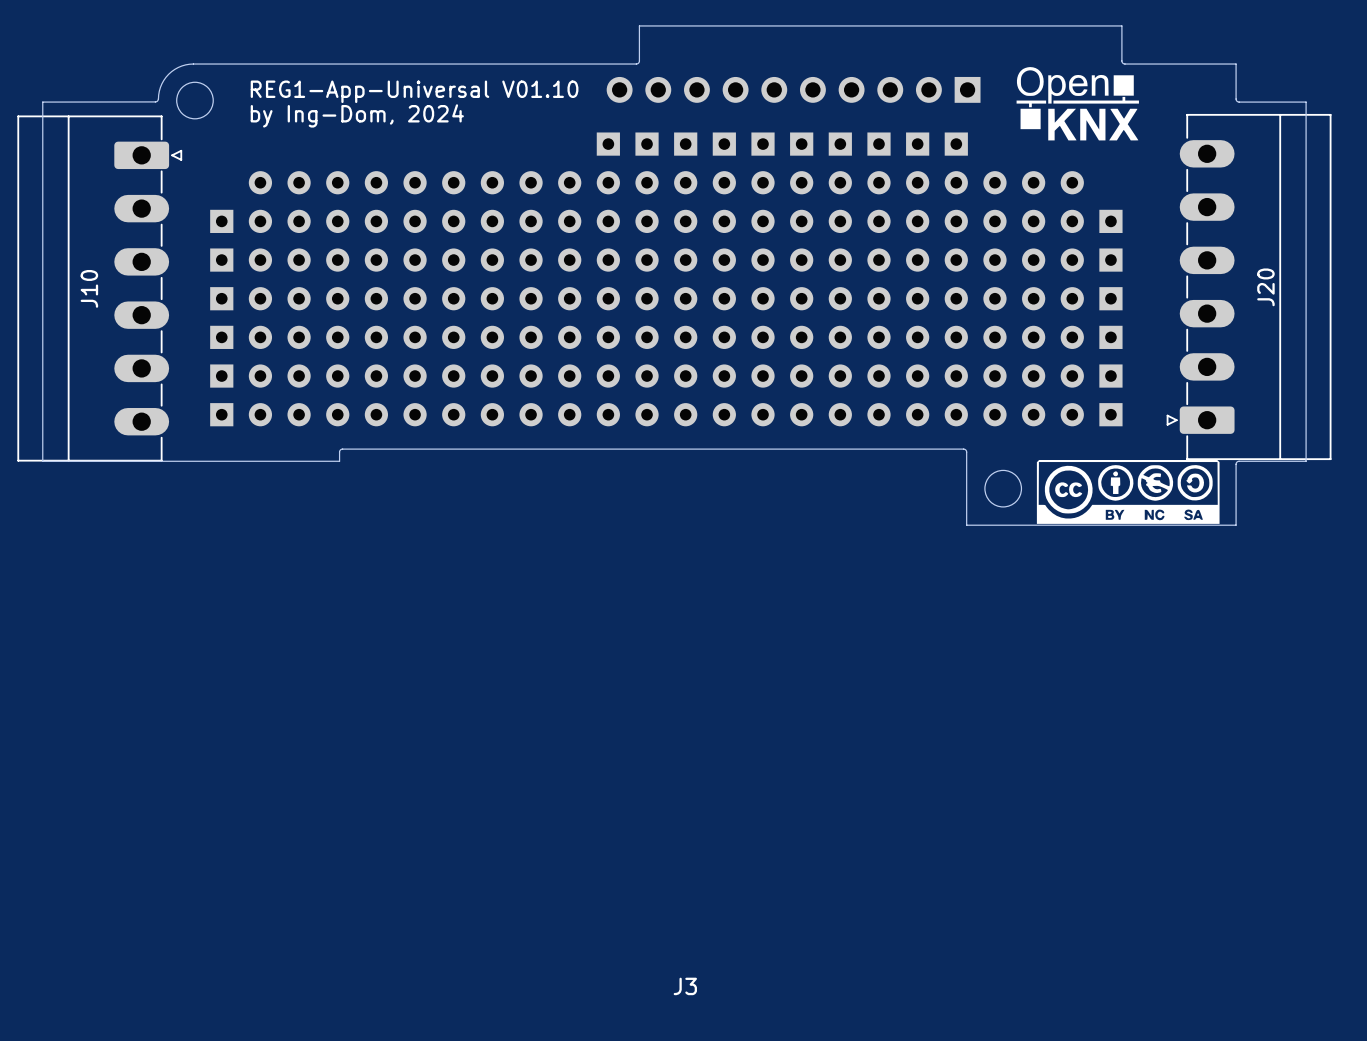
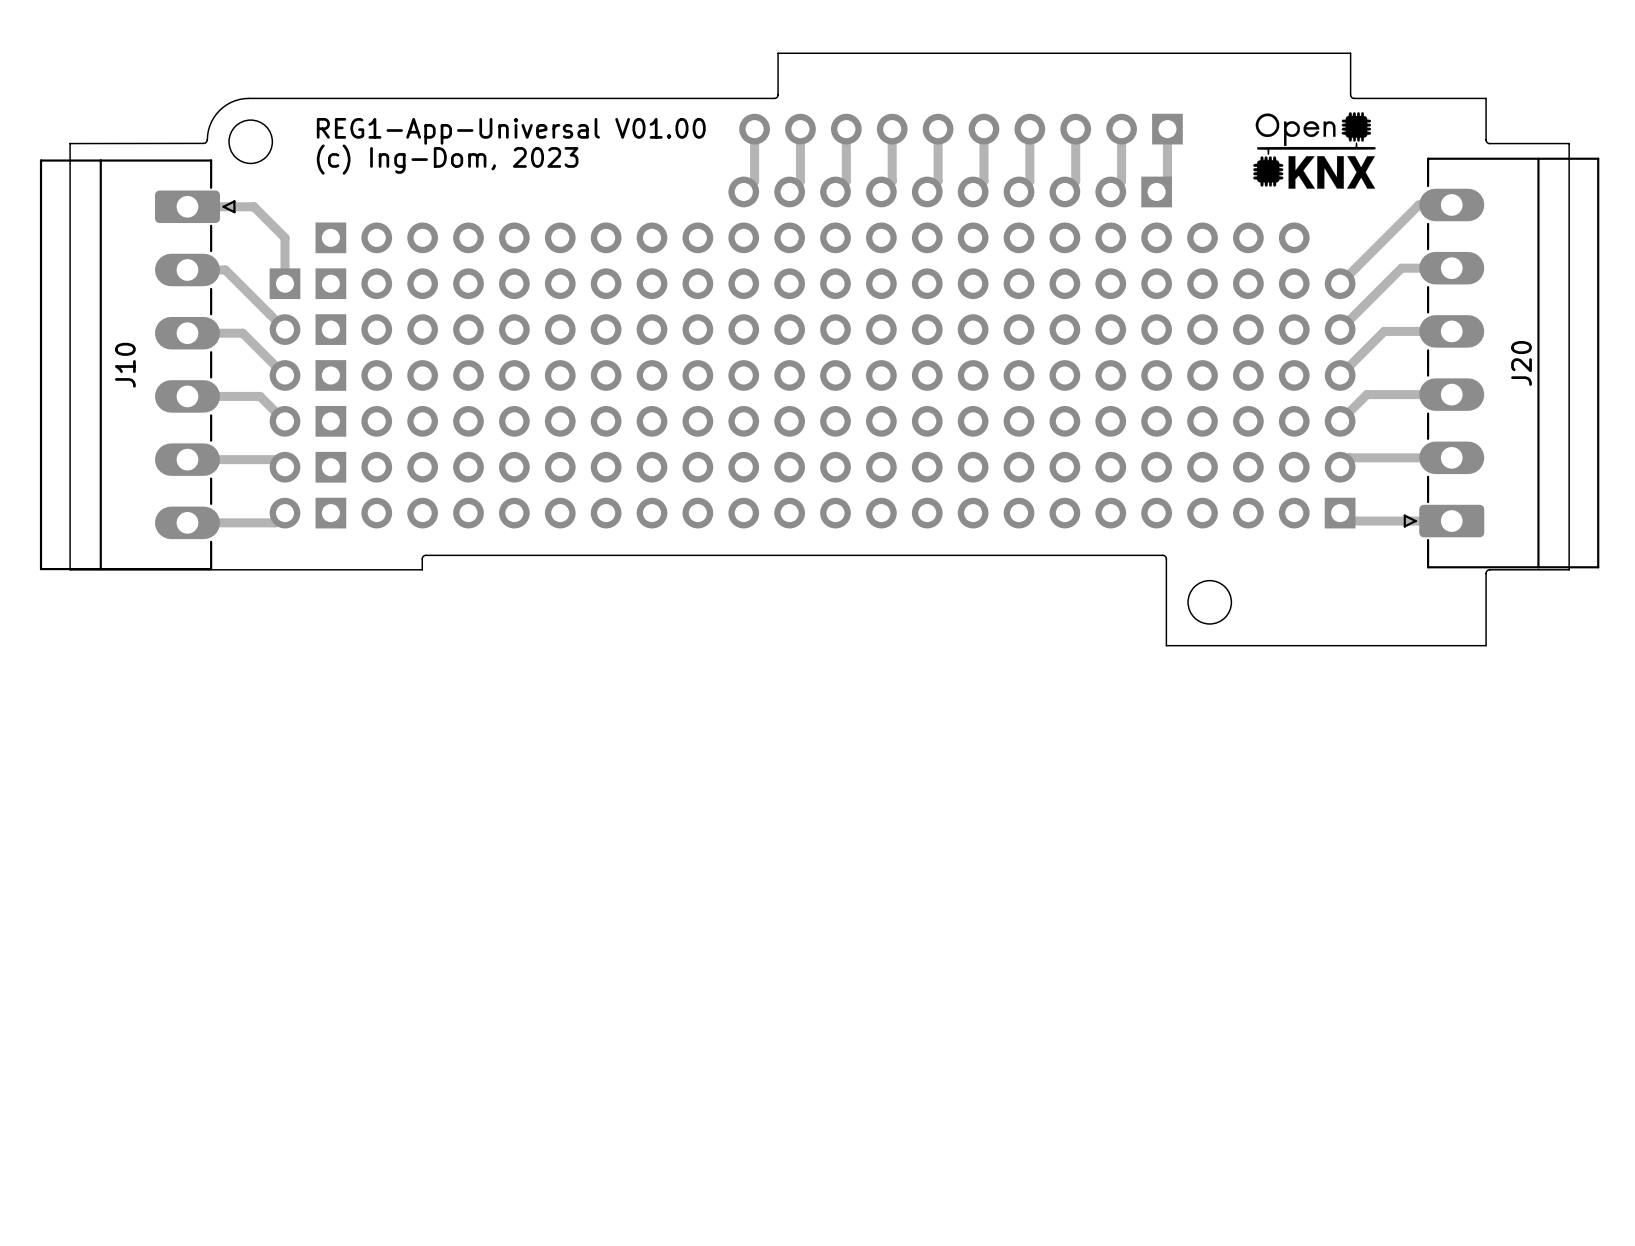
drawing shape: [1016, 67, 1139, 141] -> [1253, 112, 1376, 189]
track: none -> (754, 129) (754, 181) (743, 191)
track: none -> (800, 129) (800, 181) (789, 191)
track: none -> (846, 129) (846, 181) (835, 191)
track: none -> (892, 129) (892, 181) (881, 191)
track: none -> (938, 129) (938, 181) (927, 191)
track: none -> (983, 129) (983, 181) (973, 191)
track: none -> (1029, 129) (1029, 181) (1019, 191)
track: none -> (1075, 129) (1075, 181) (1064, 191)
track: none -> (1121, 129) (1121, 181) (1110, 191)
track: none -> (1167, 129) (1167, 181) (1156, 191)
text: REG1-App-Universal V01.10 (414, 91) -> REG1-App-Universal V01.00 (511, 131)
text: by Ing-Dom, 2024 (357, 115) -> (c) Ing-Dom, 2023 (447, 159)
part: none -> (950, 191)
track: none -> (1451, 204) (1418, 204) (1340, 283)
track: none -> (187, 206) (253, 206) (285, 237) (285, 283)
part: none -> (812, 237)
track: none -> (1451, 268) (1401, 268) (1340, 329)
track: none -> (187, 269) (225, 269) (285, 329)
part: none -> (812, 283)
part: none -> (812, 329)
track: none -> (1451, 331) (1384, 331) (1340, 375)
track: none -> (187, 333) (242, 333) (285, 375)
J3: (666, 279) -> none
part: none -> (812, 375)
track: none -> (1451, 394) (1366, 394) (1340, 421)
track: none -> (187, 396) (260, 396) (285, 421)
part: none -> (285, 398)
part: none -> (1340, 398)
part: none -> (812, 421)
track: none -> (1451, 457) (1349, 457) (1340, 467)
track: none -> (187, 459) (277, 459)
part: none -> (812, 467)
track: none -> (285, 513) (275, 522) (187, 522)
part: none -> (812, 513)
track: none -> (1340, 513) (1348, 521) (1451, 521)
drawing: [1036, 459, 1220, 524] -> none

